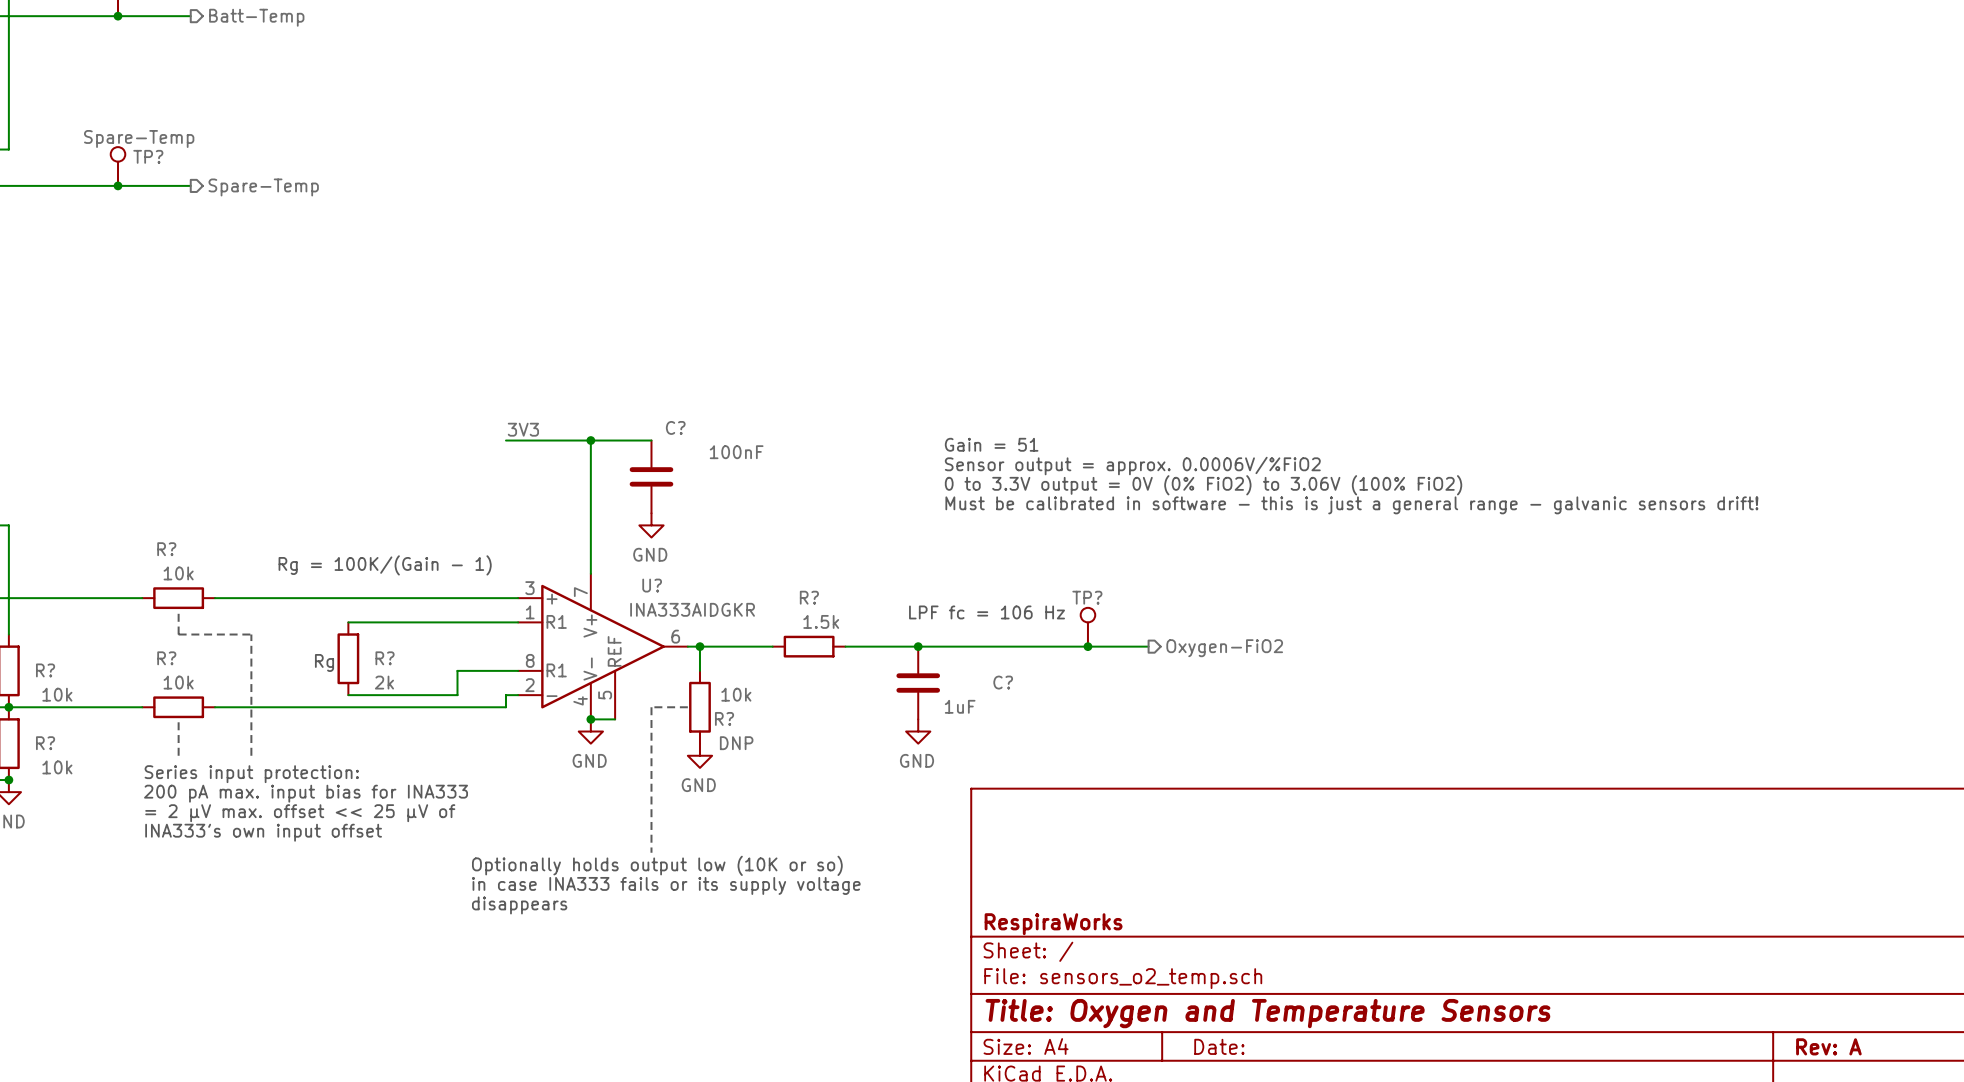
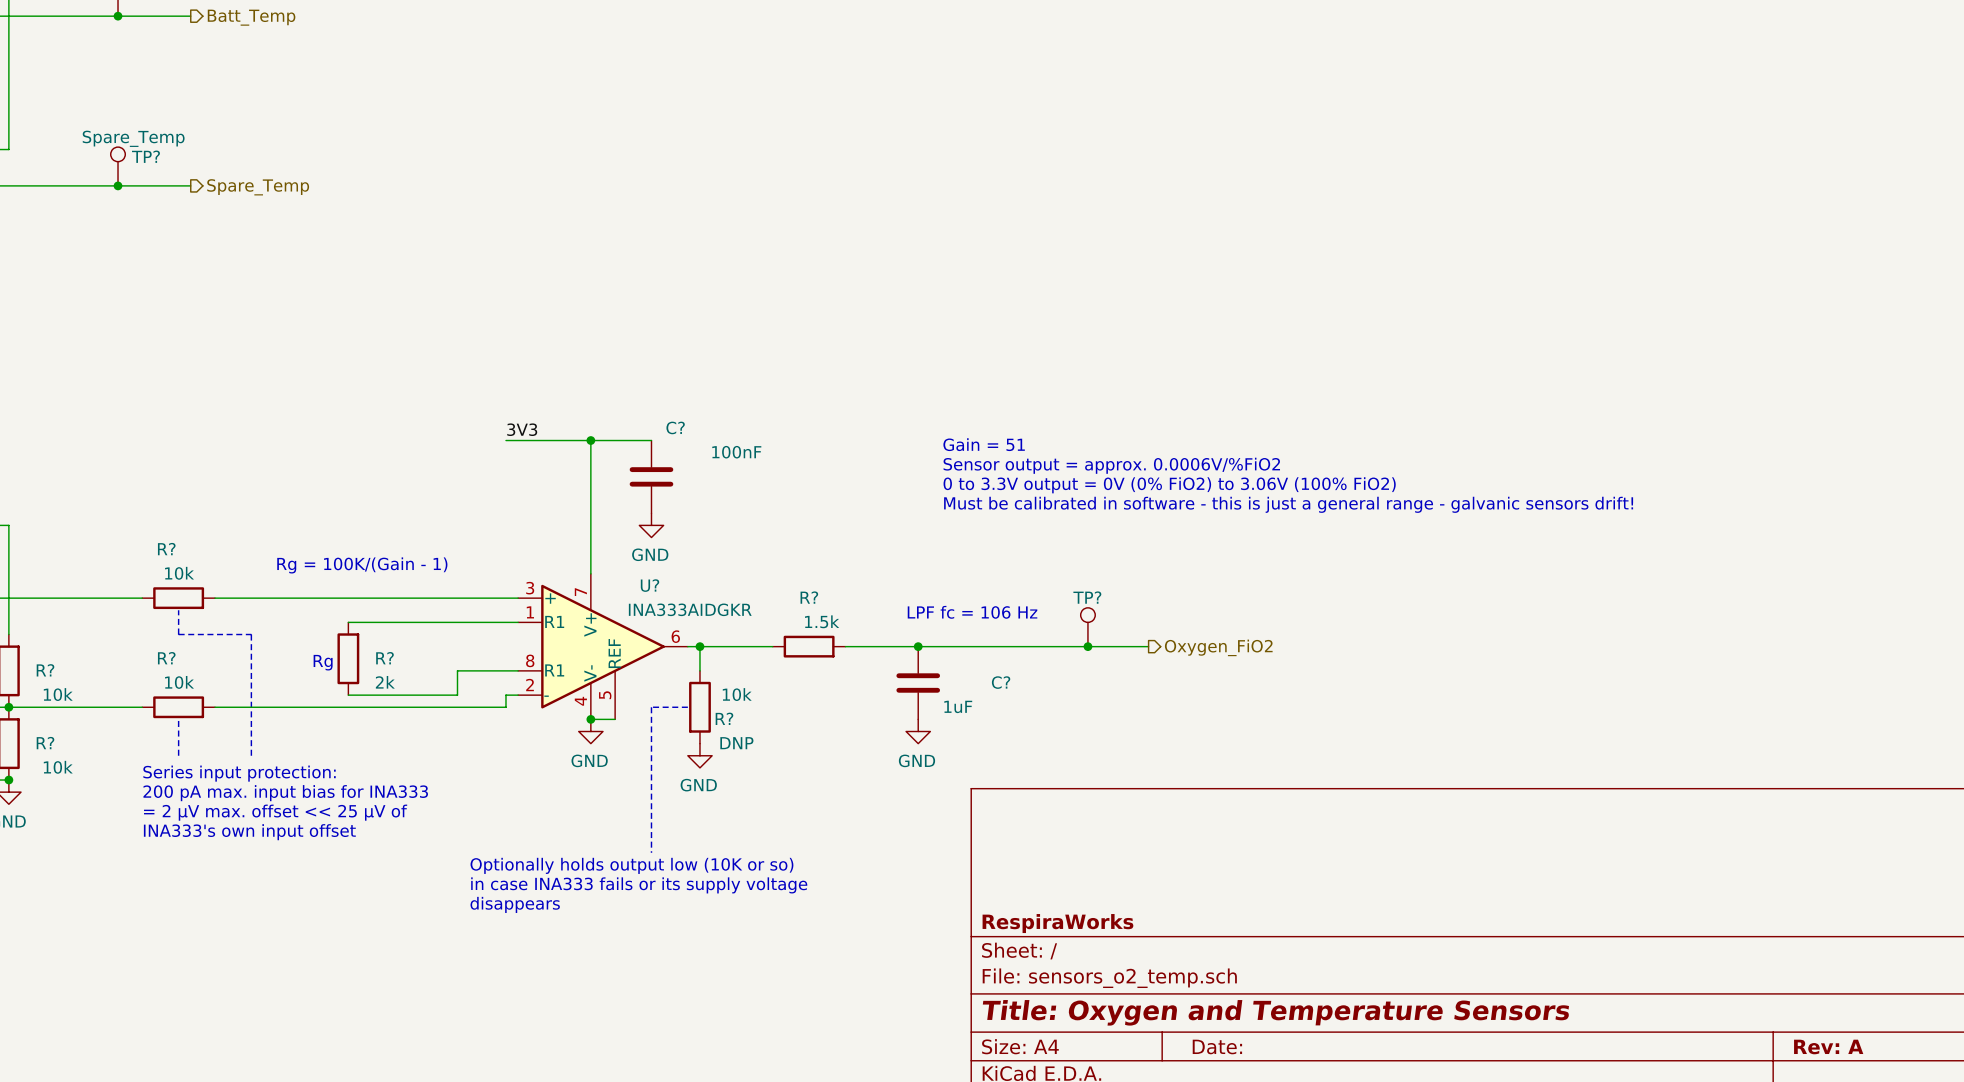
hierarchical label: Batt-Temp (256, 17) -> Batt_Temp (251, 17)
TP? value: Spare-Temp (139, 138) -> Spare_Temp (133, 138)
hierarchical label: Spare-Temp (263, 187) -> Spare_Temp (258, 187)
hierarchical label: Oxygen-FiO2 (1224, 648) -> Oxygen_FiO2 (1218, 647)

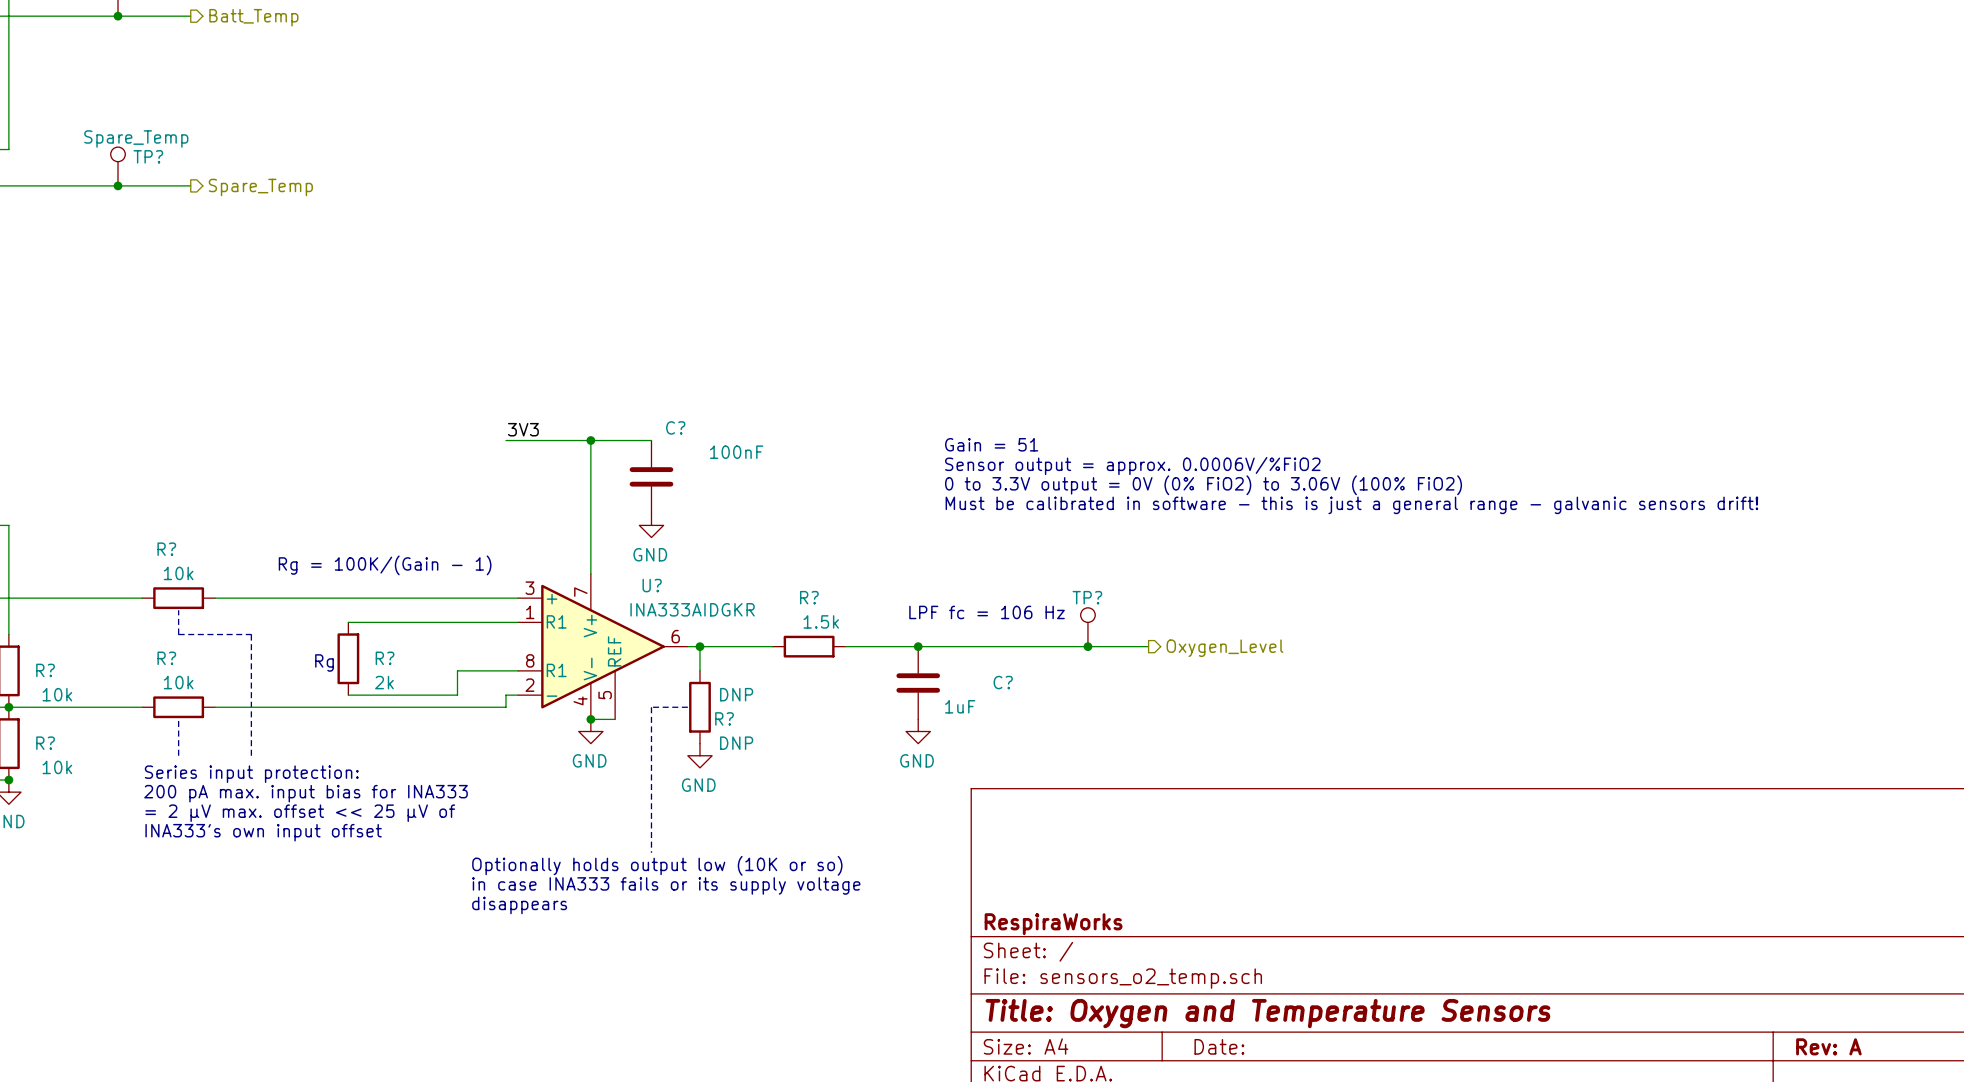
hierarchical label: Oxygen_FiO2 (1218, 647) -> Oxygen_Level (1224, 648)
R? value: 10k (737, 694) -> DNP (736, 694)

